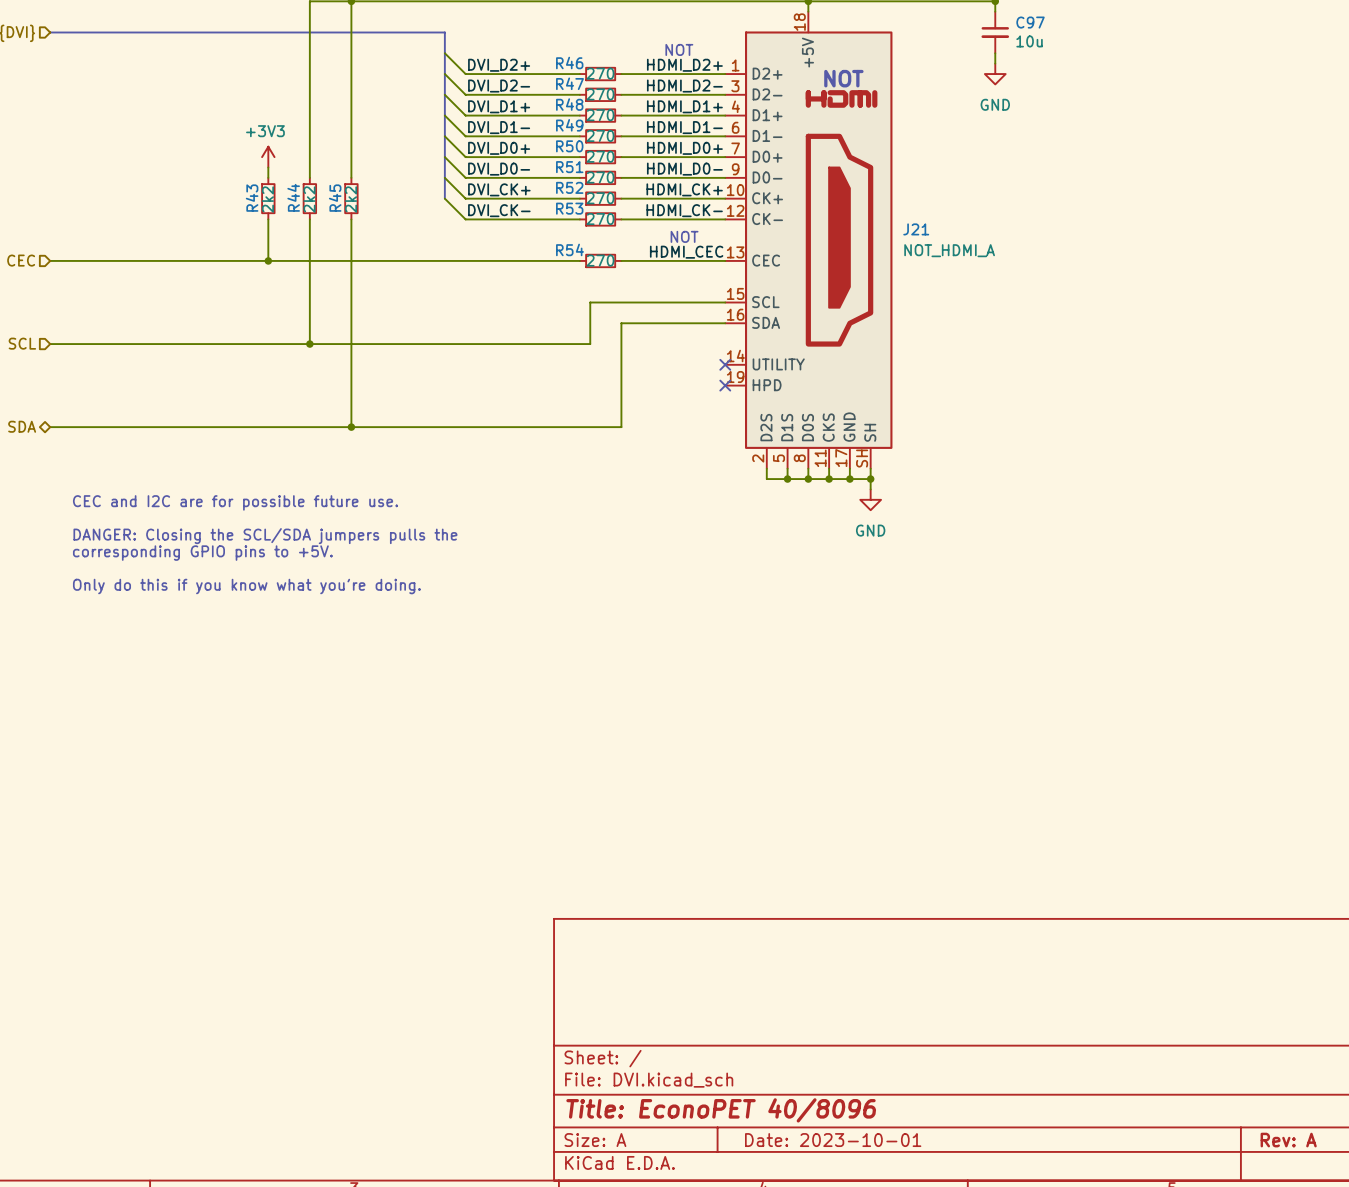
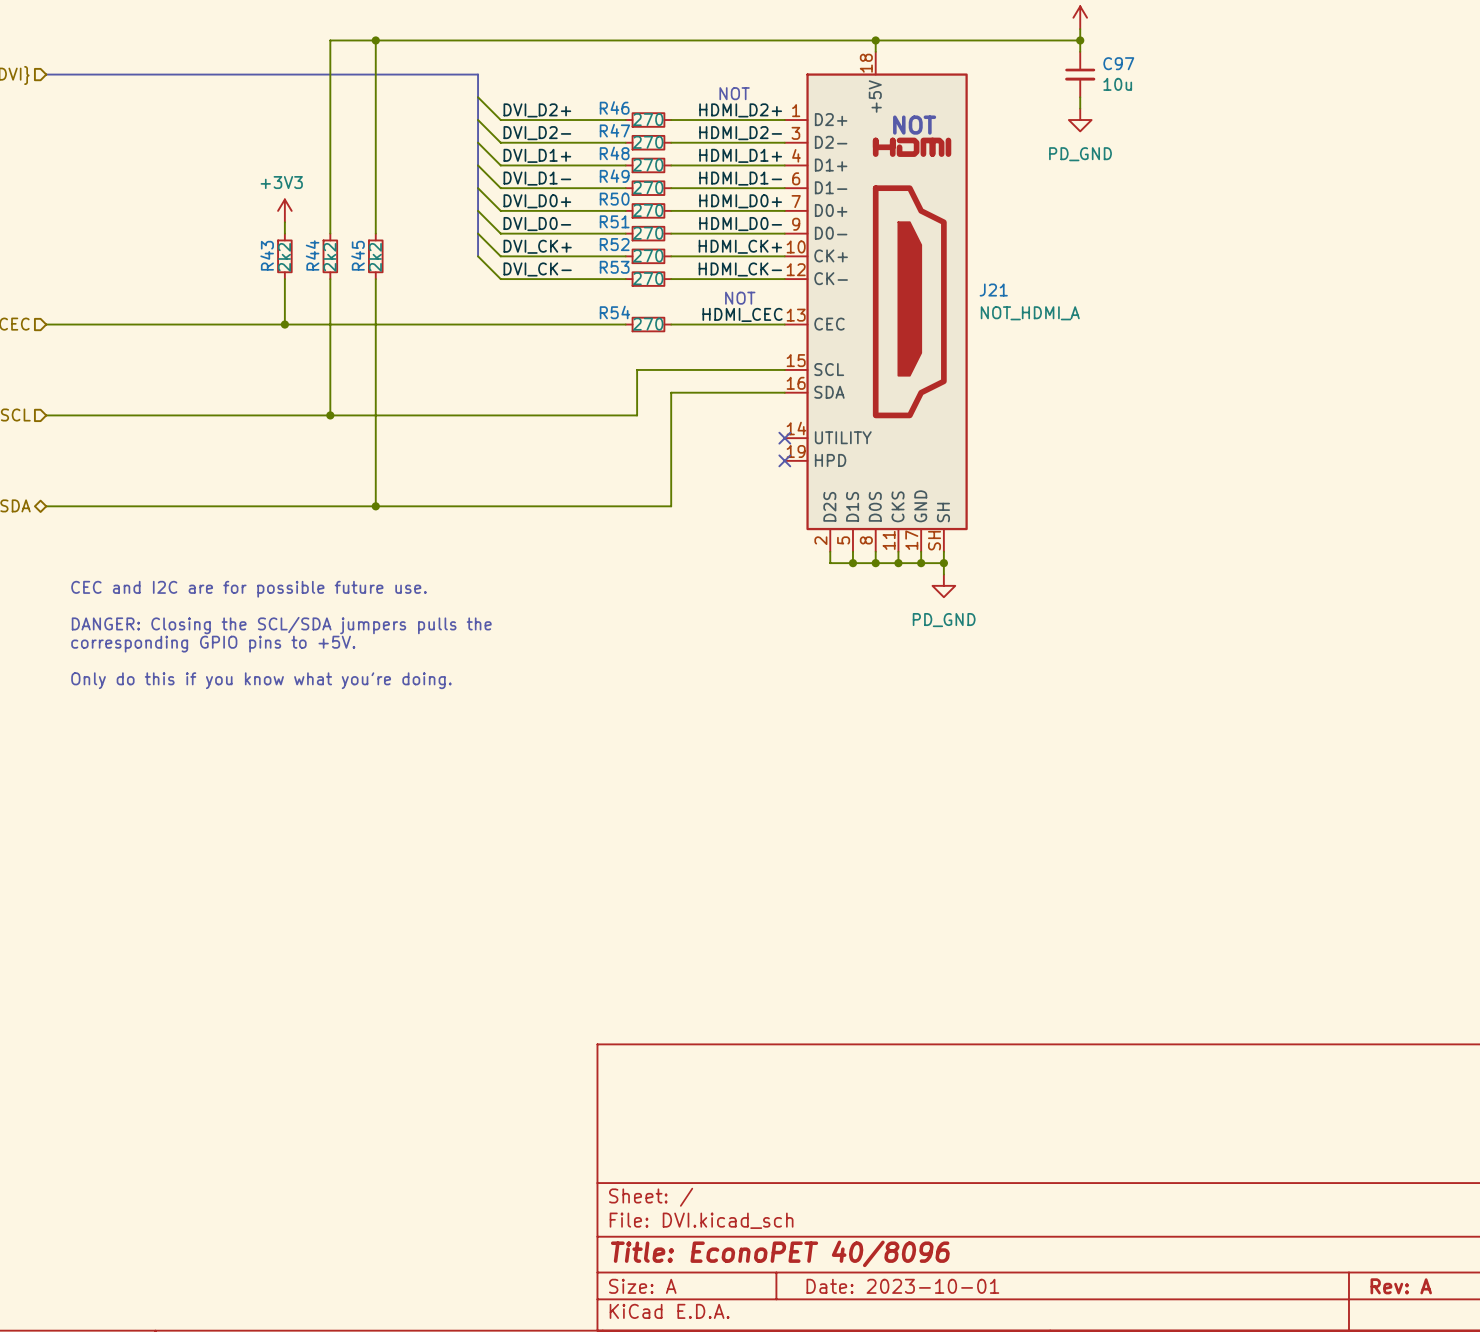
power symbol: GND (995, 74) -> PD_GND (1080, 120)
power symbol: GND (870, 499) -> PD_GND (943, 585)

